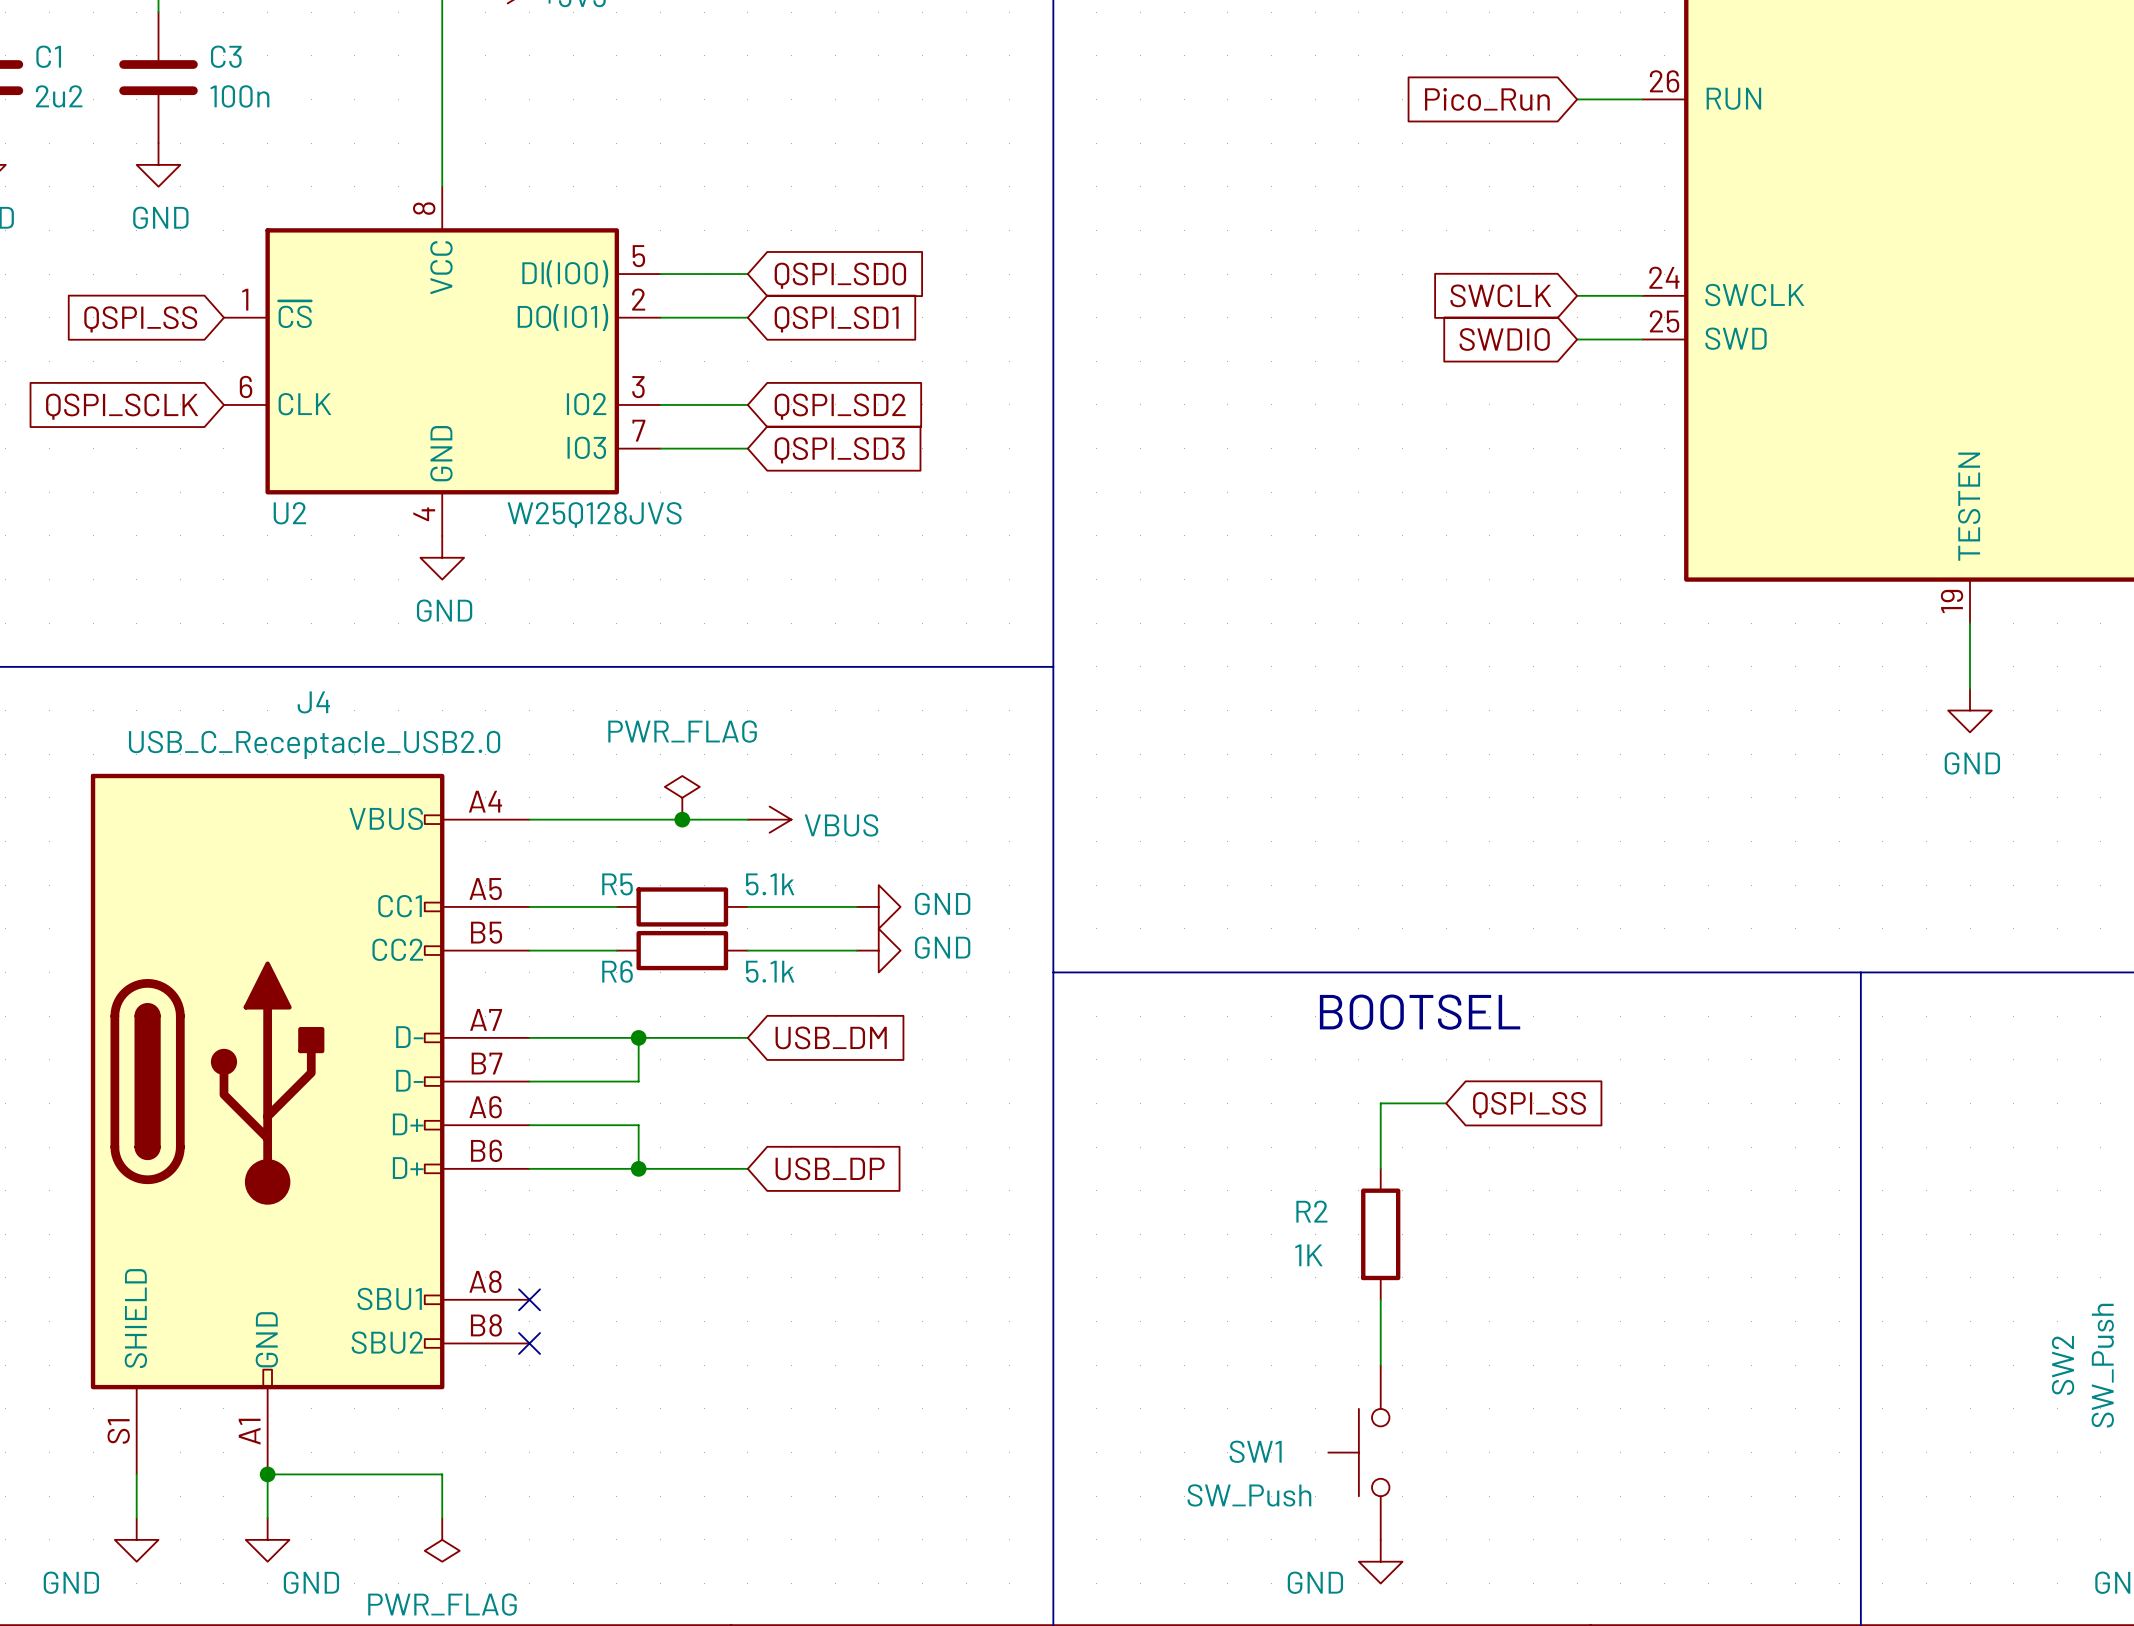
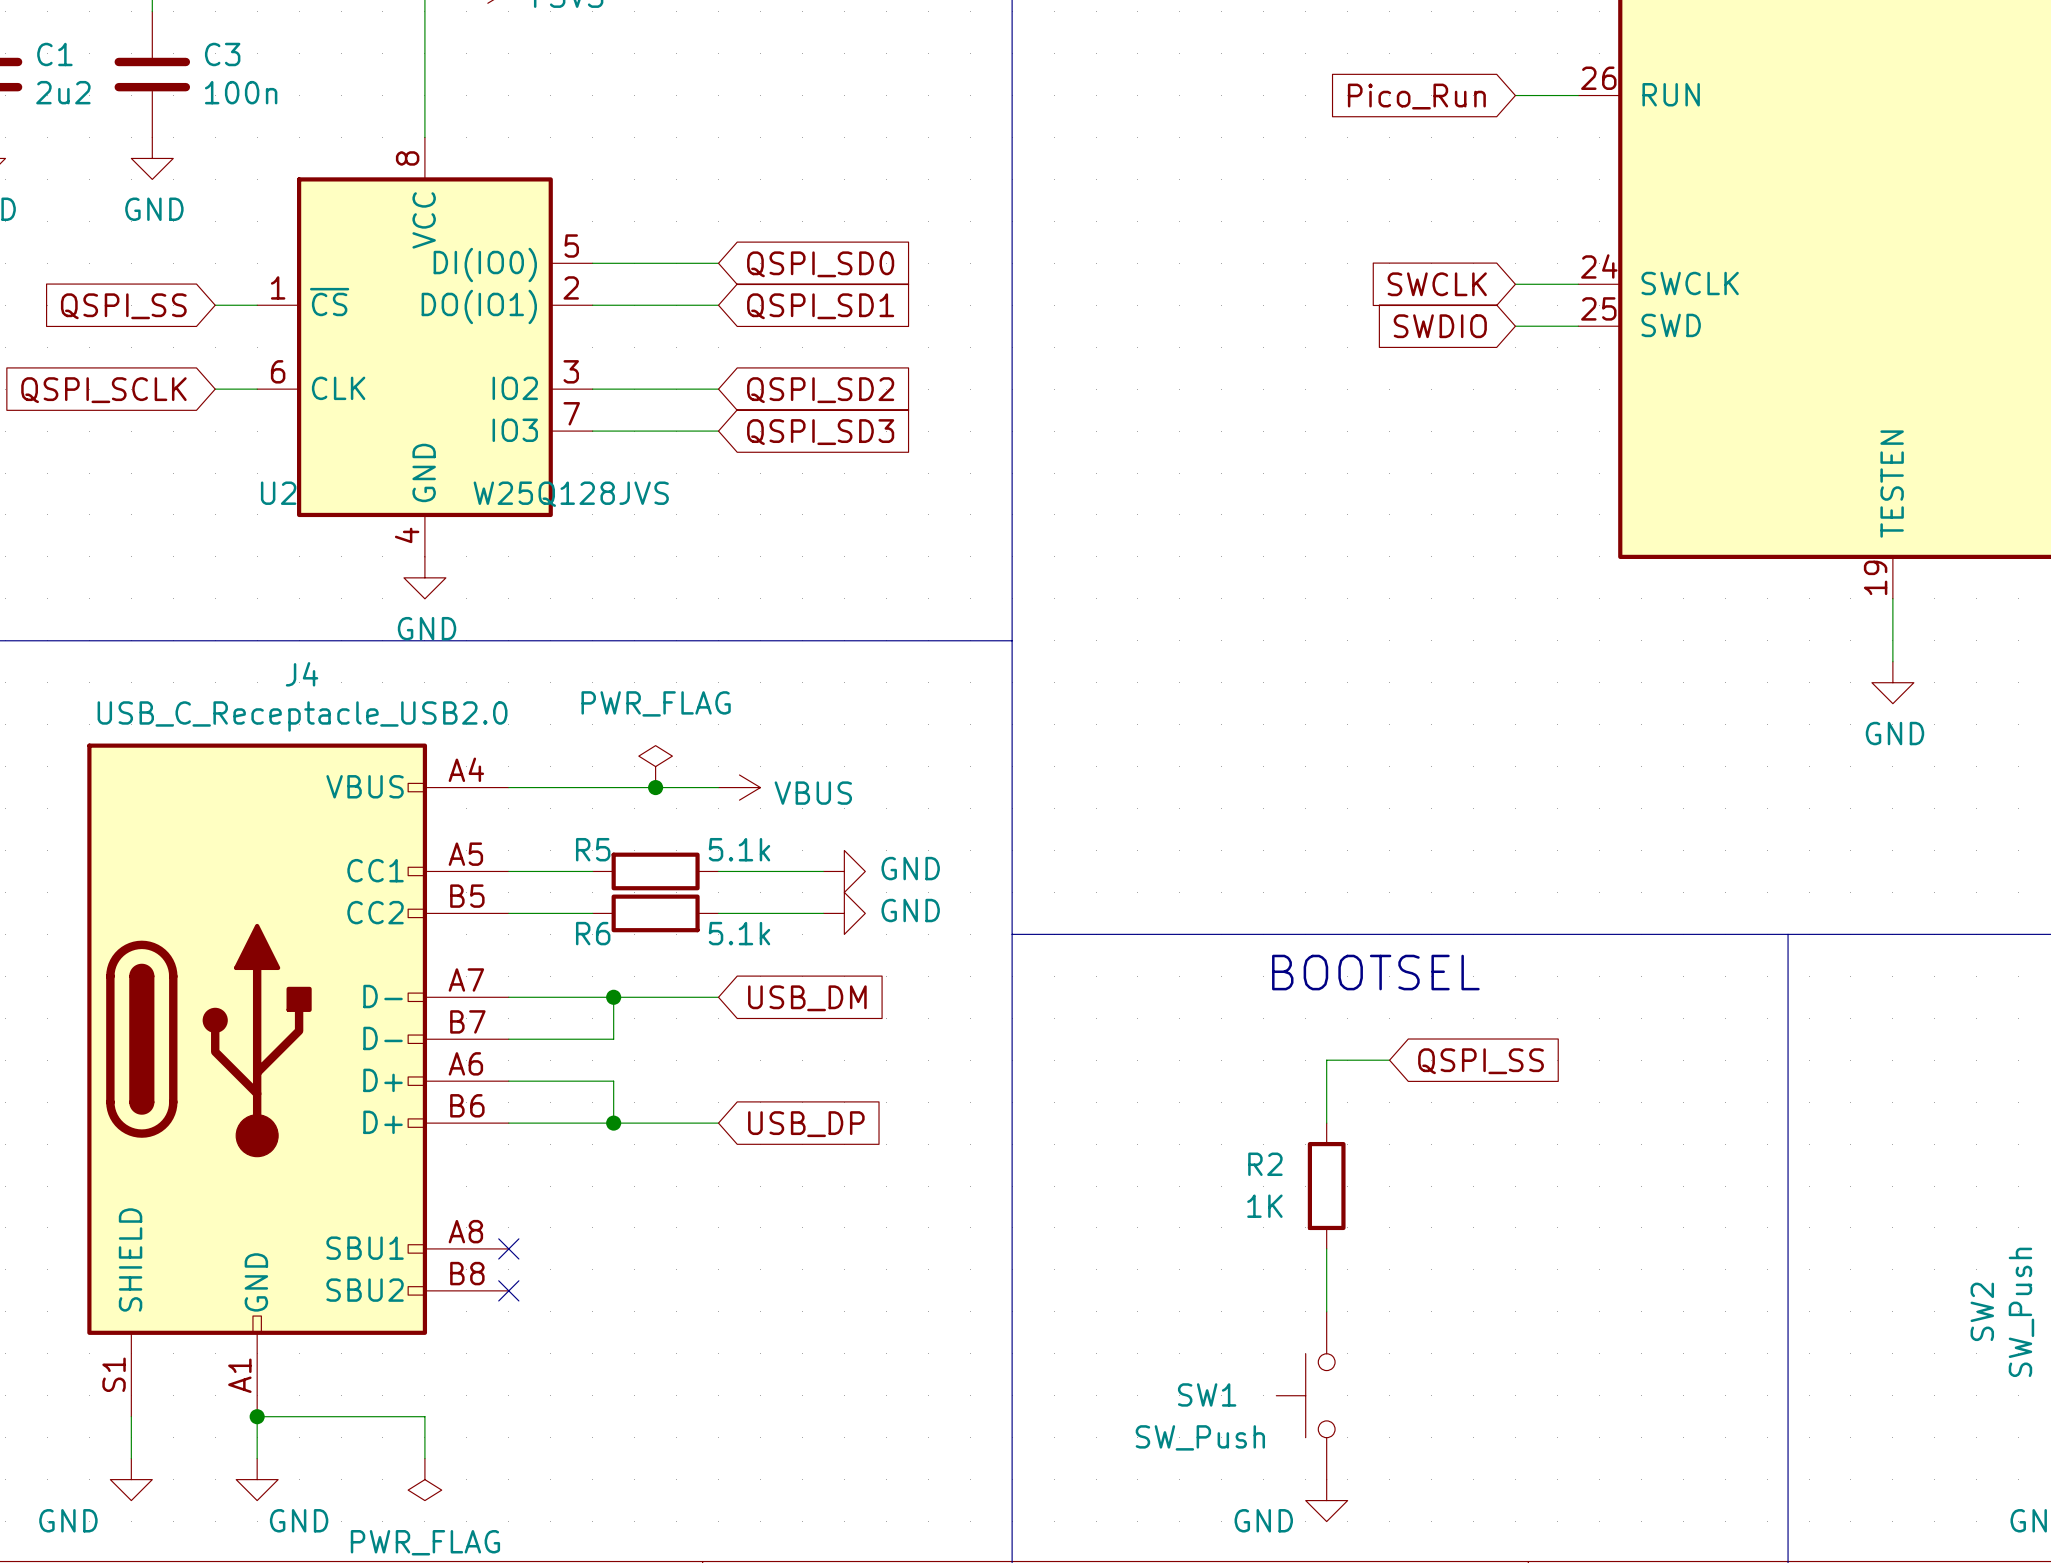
U2 symbol: [223, 186, 661, 536] -> [257, 137, 593, 557]
power symbol position: GND (442, 557) -> GND (424, 577)

